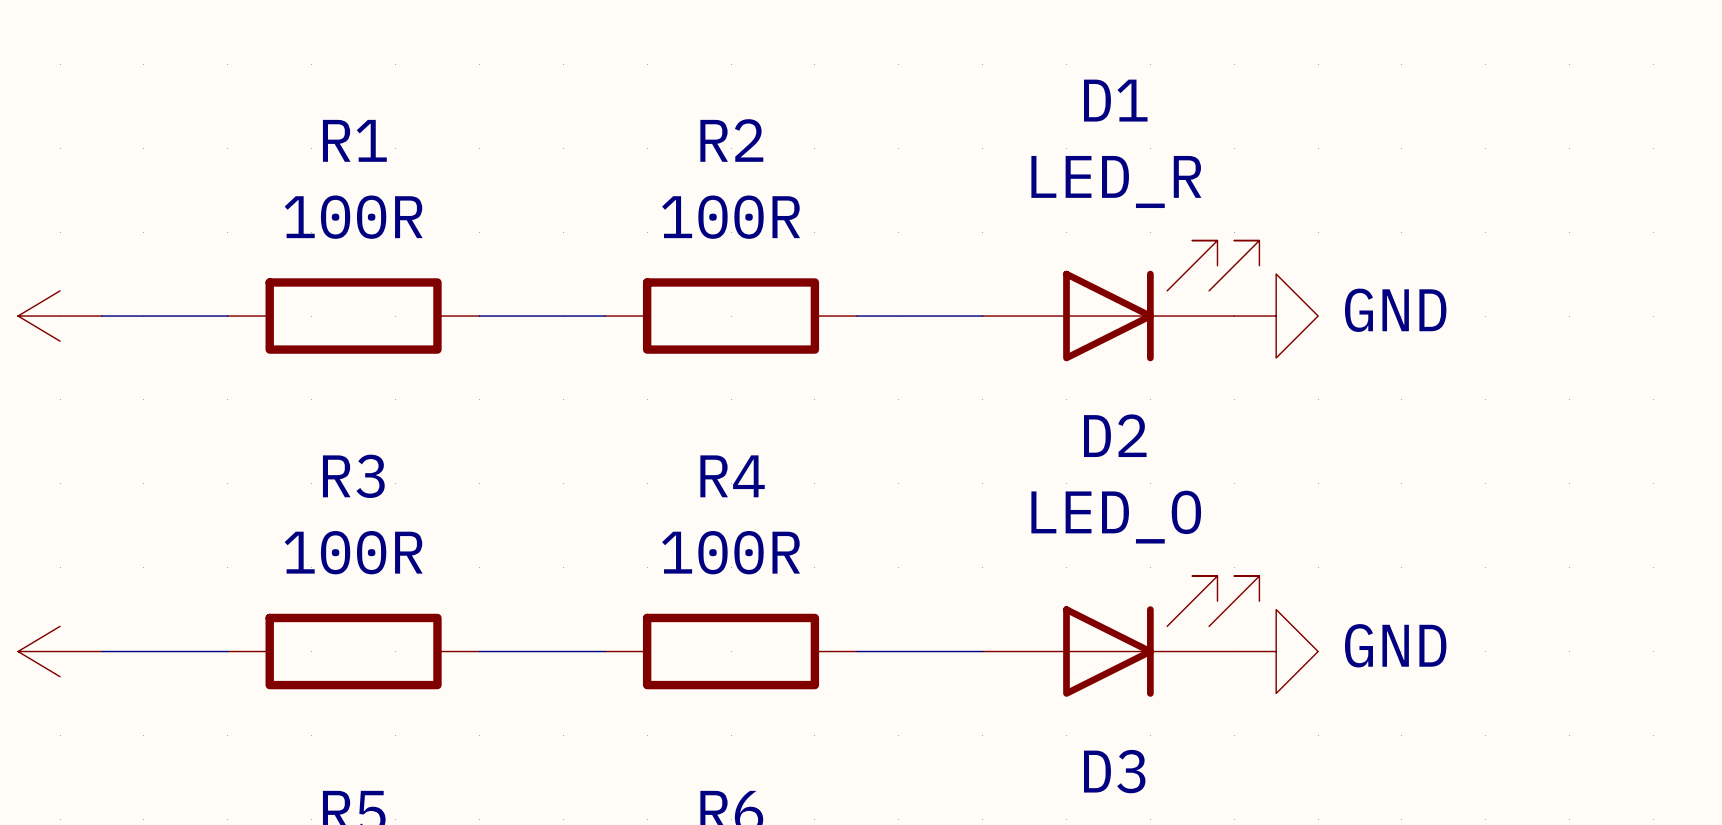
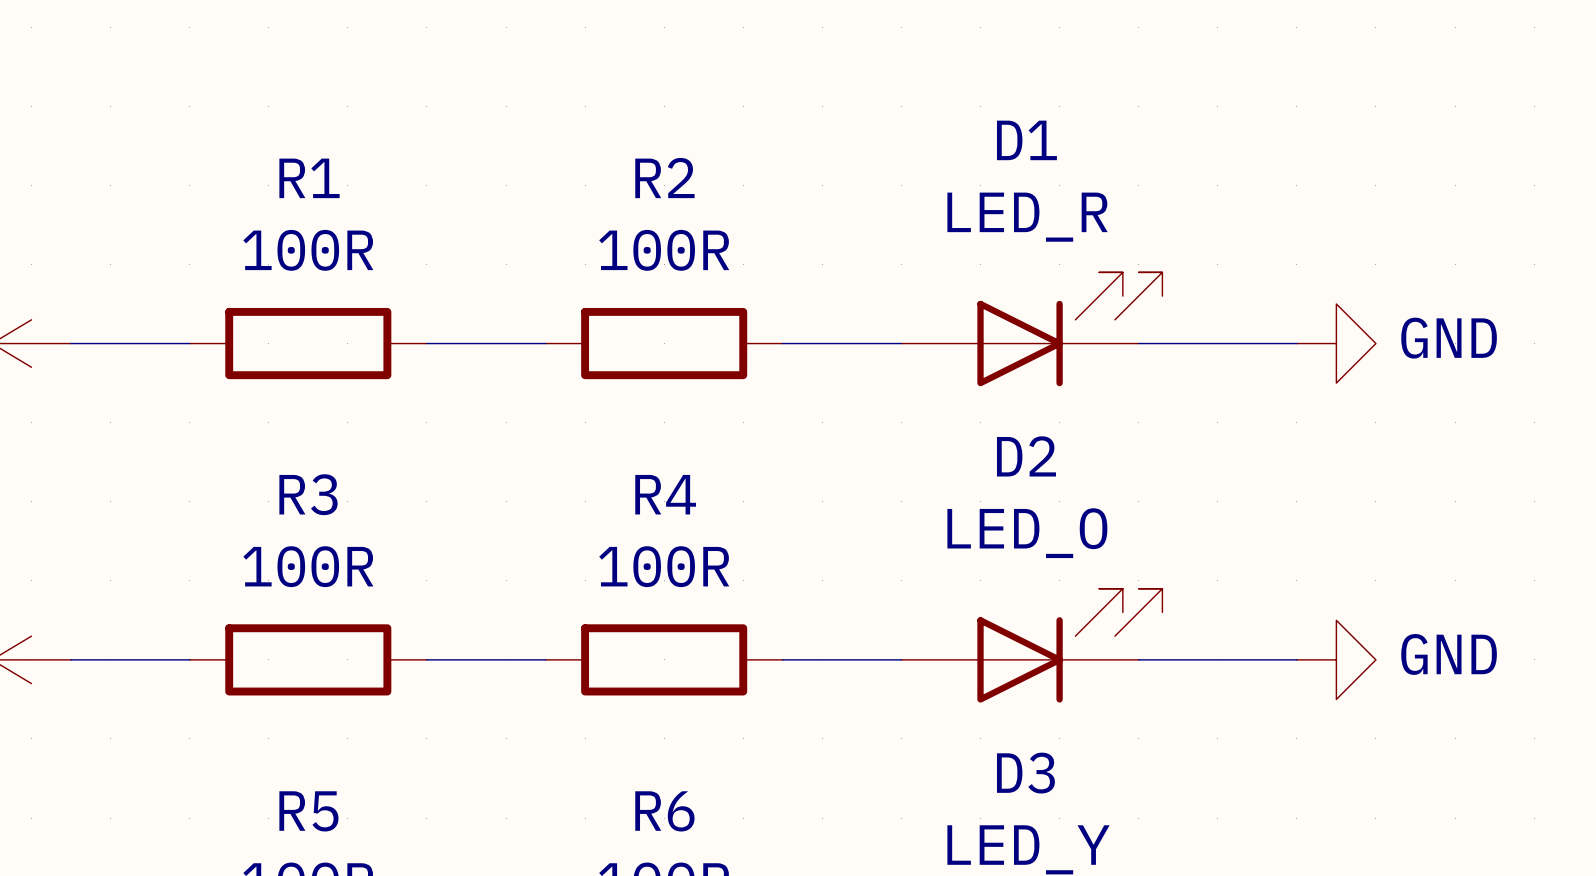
wire: none -> (1138, 343) (1296, 343)
power symbol position: GND (1276, 316) -> GND (1336, 343)
wire: none -> (1138, 659) (1296, 659)
power symbol position: GND (1276, 651) -> GND (1336, 659)

